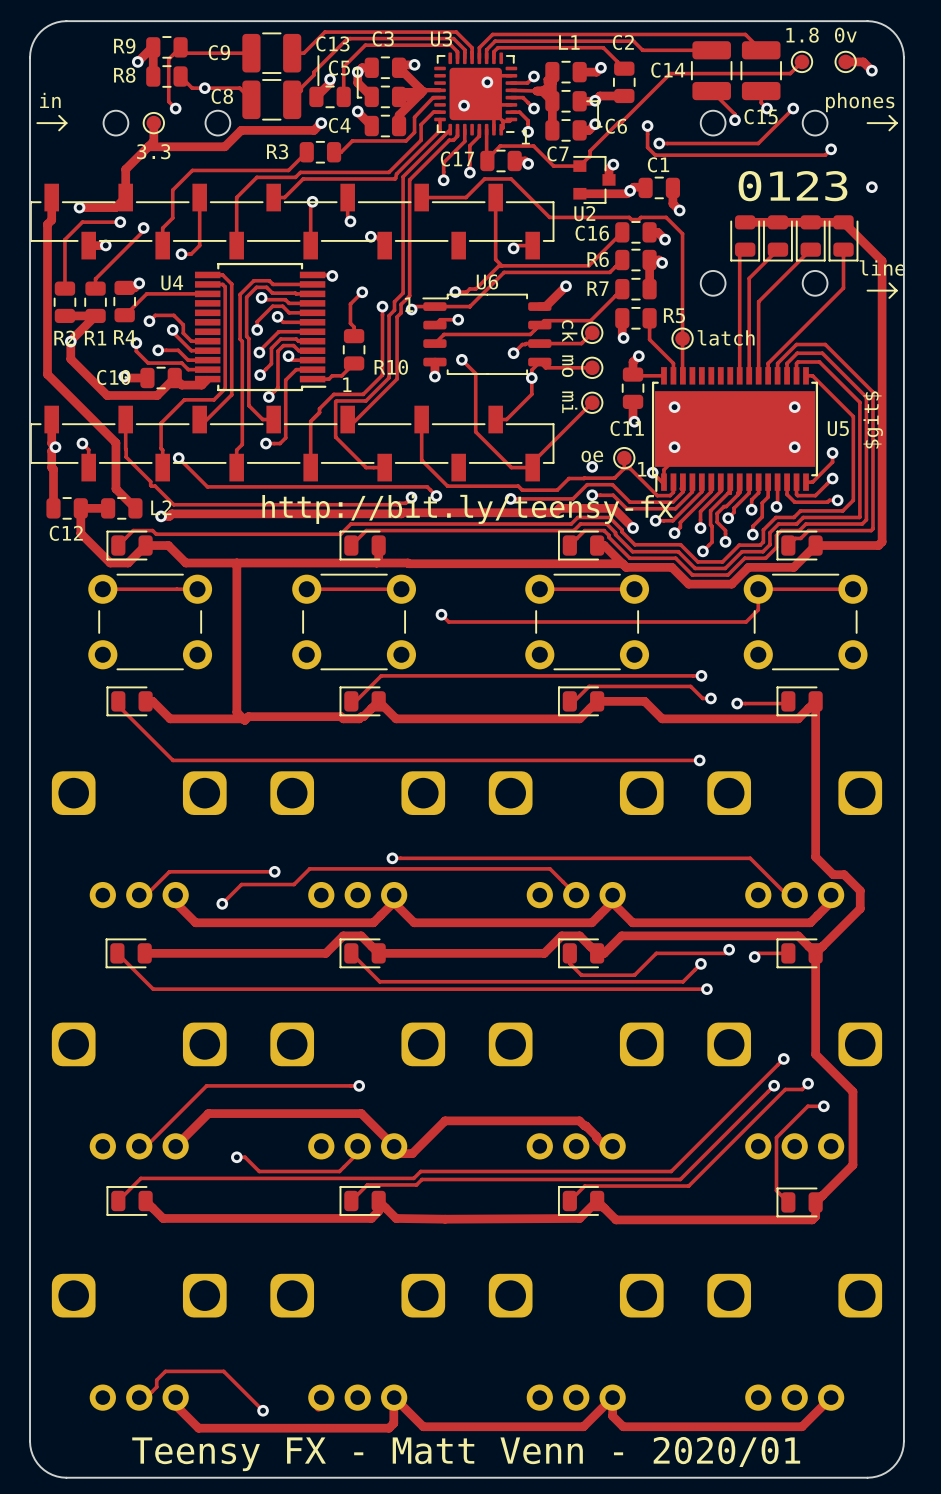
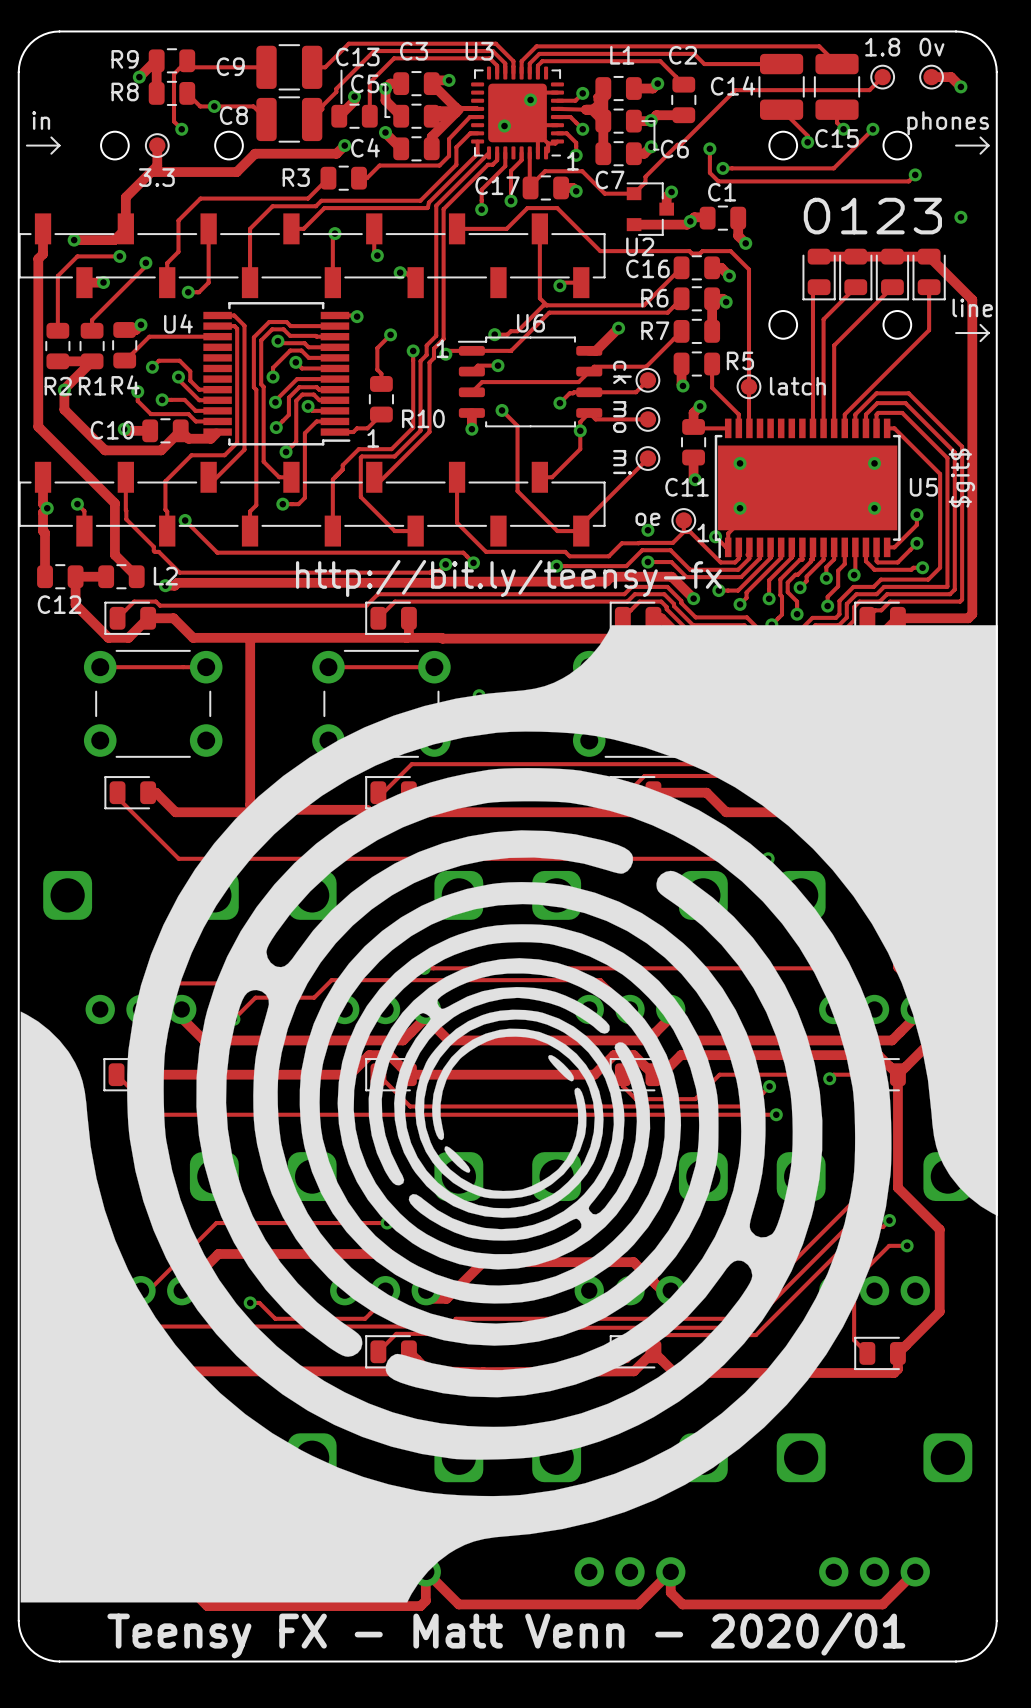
drawing: none -> [20, 625, 999, 1603]

